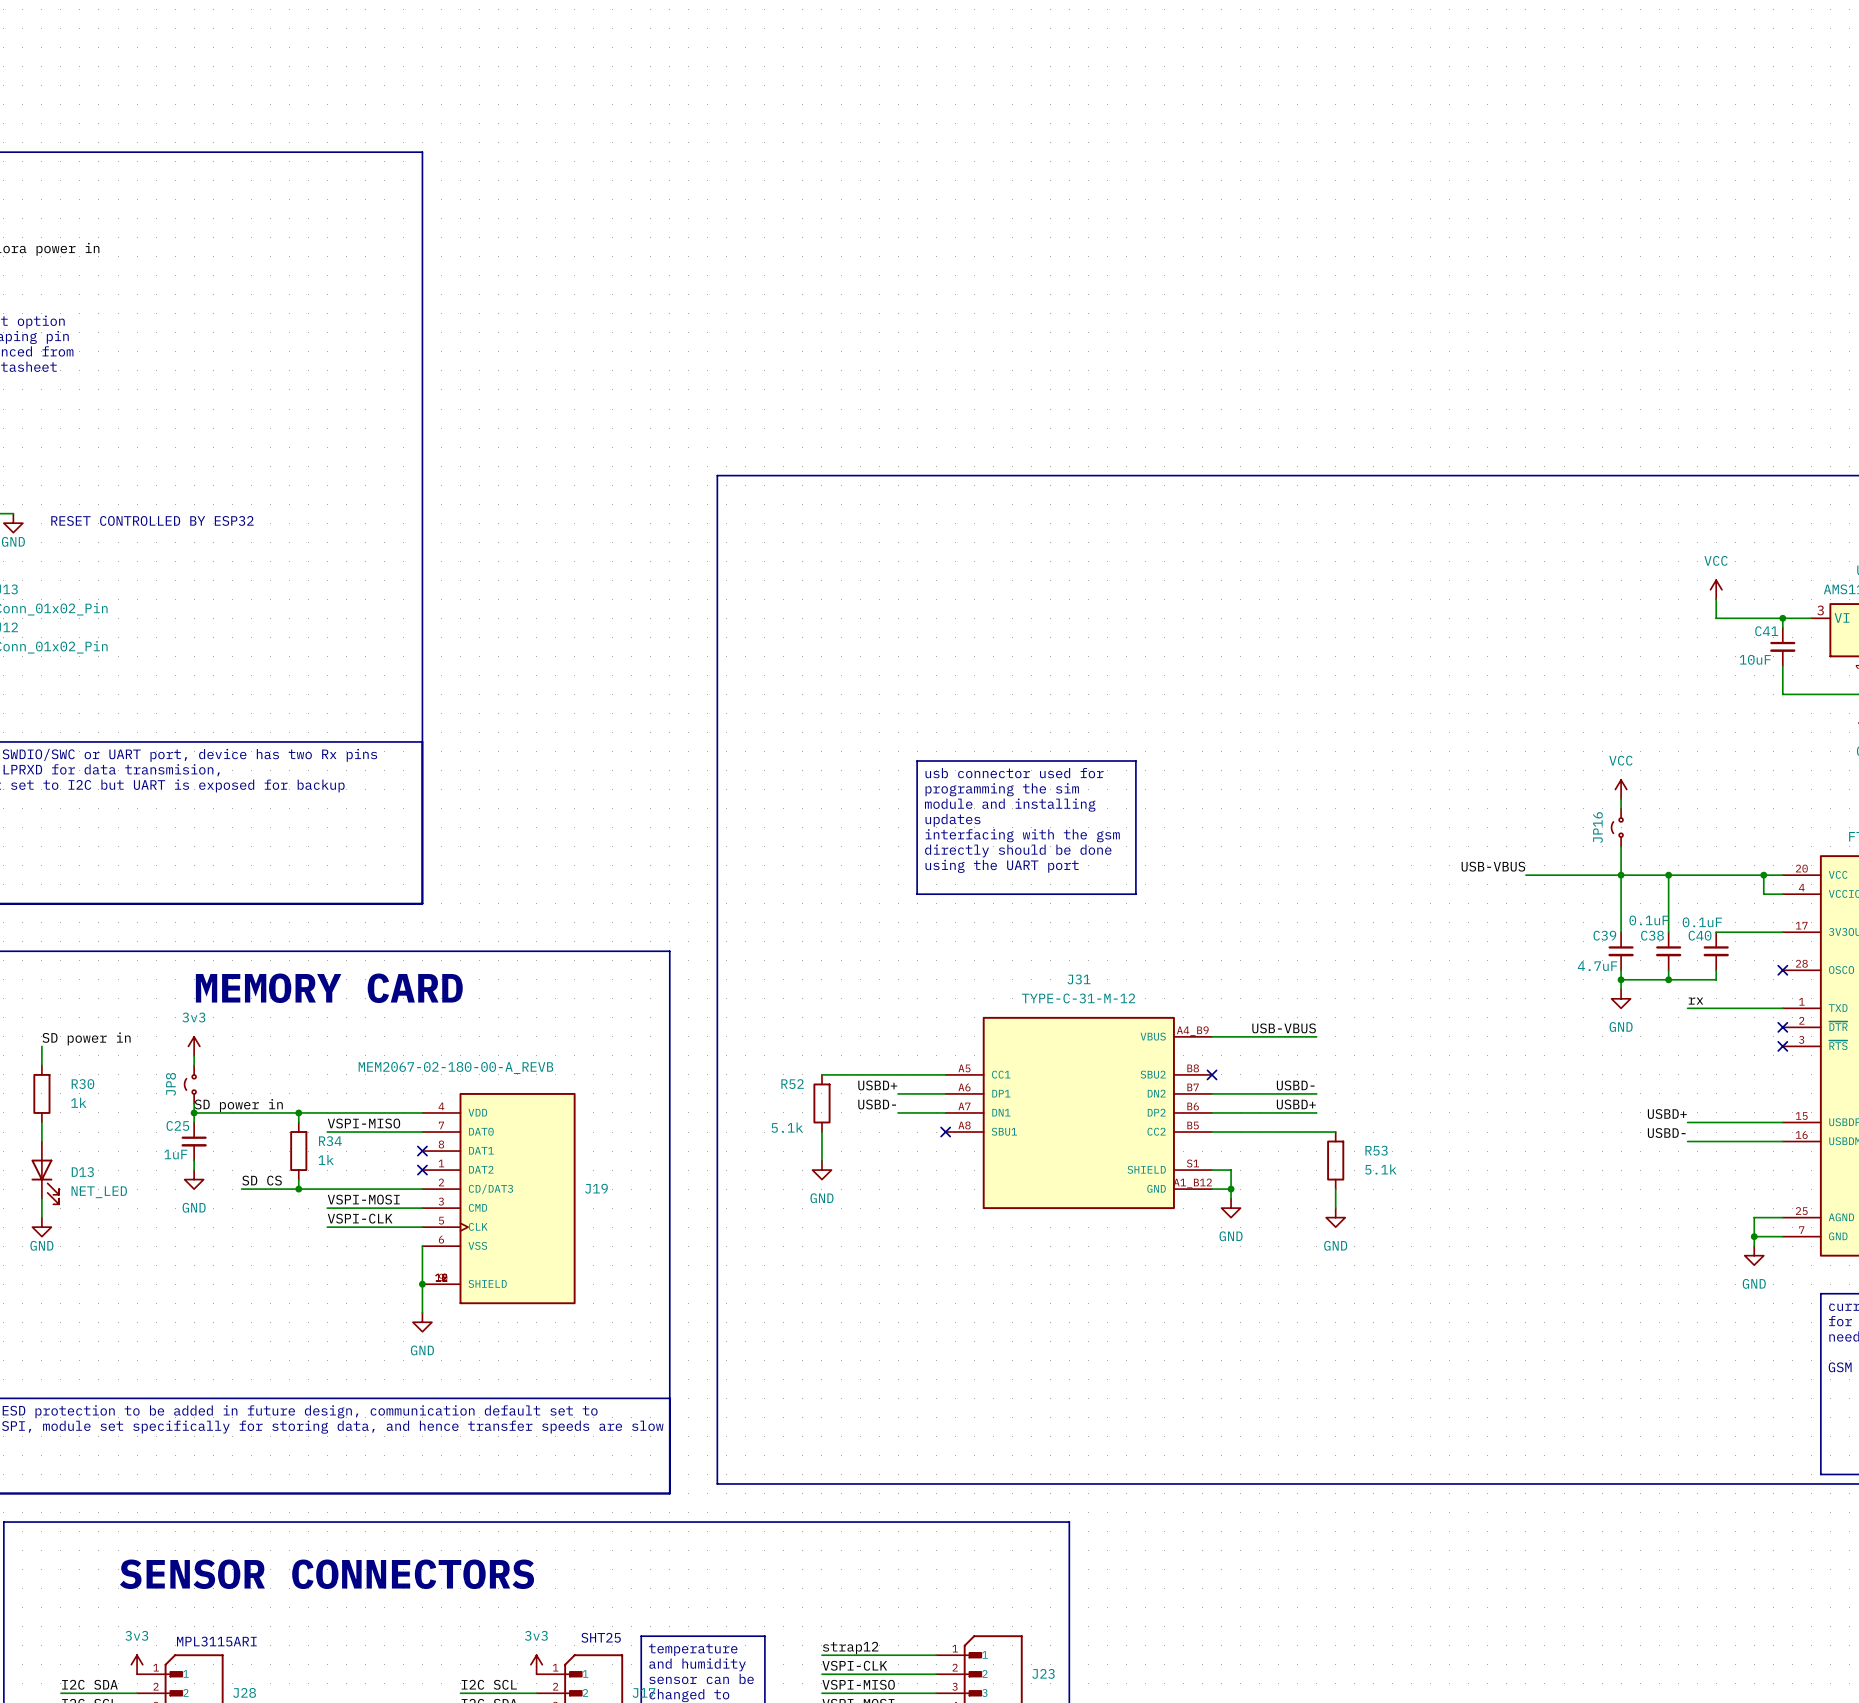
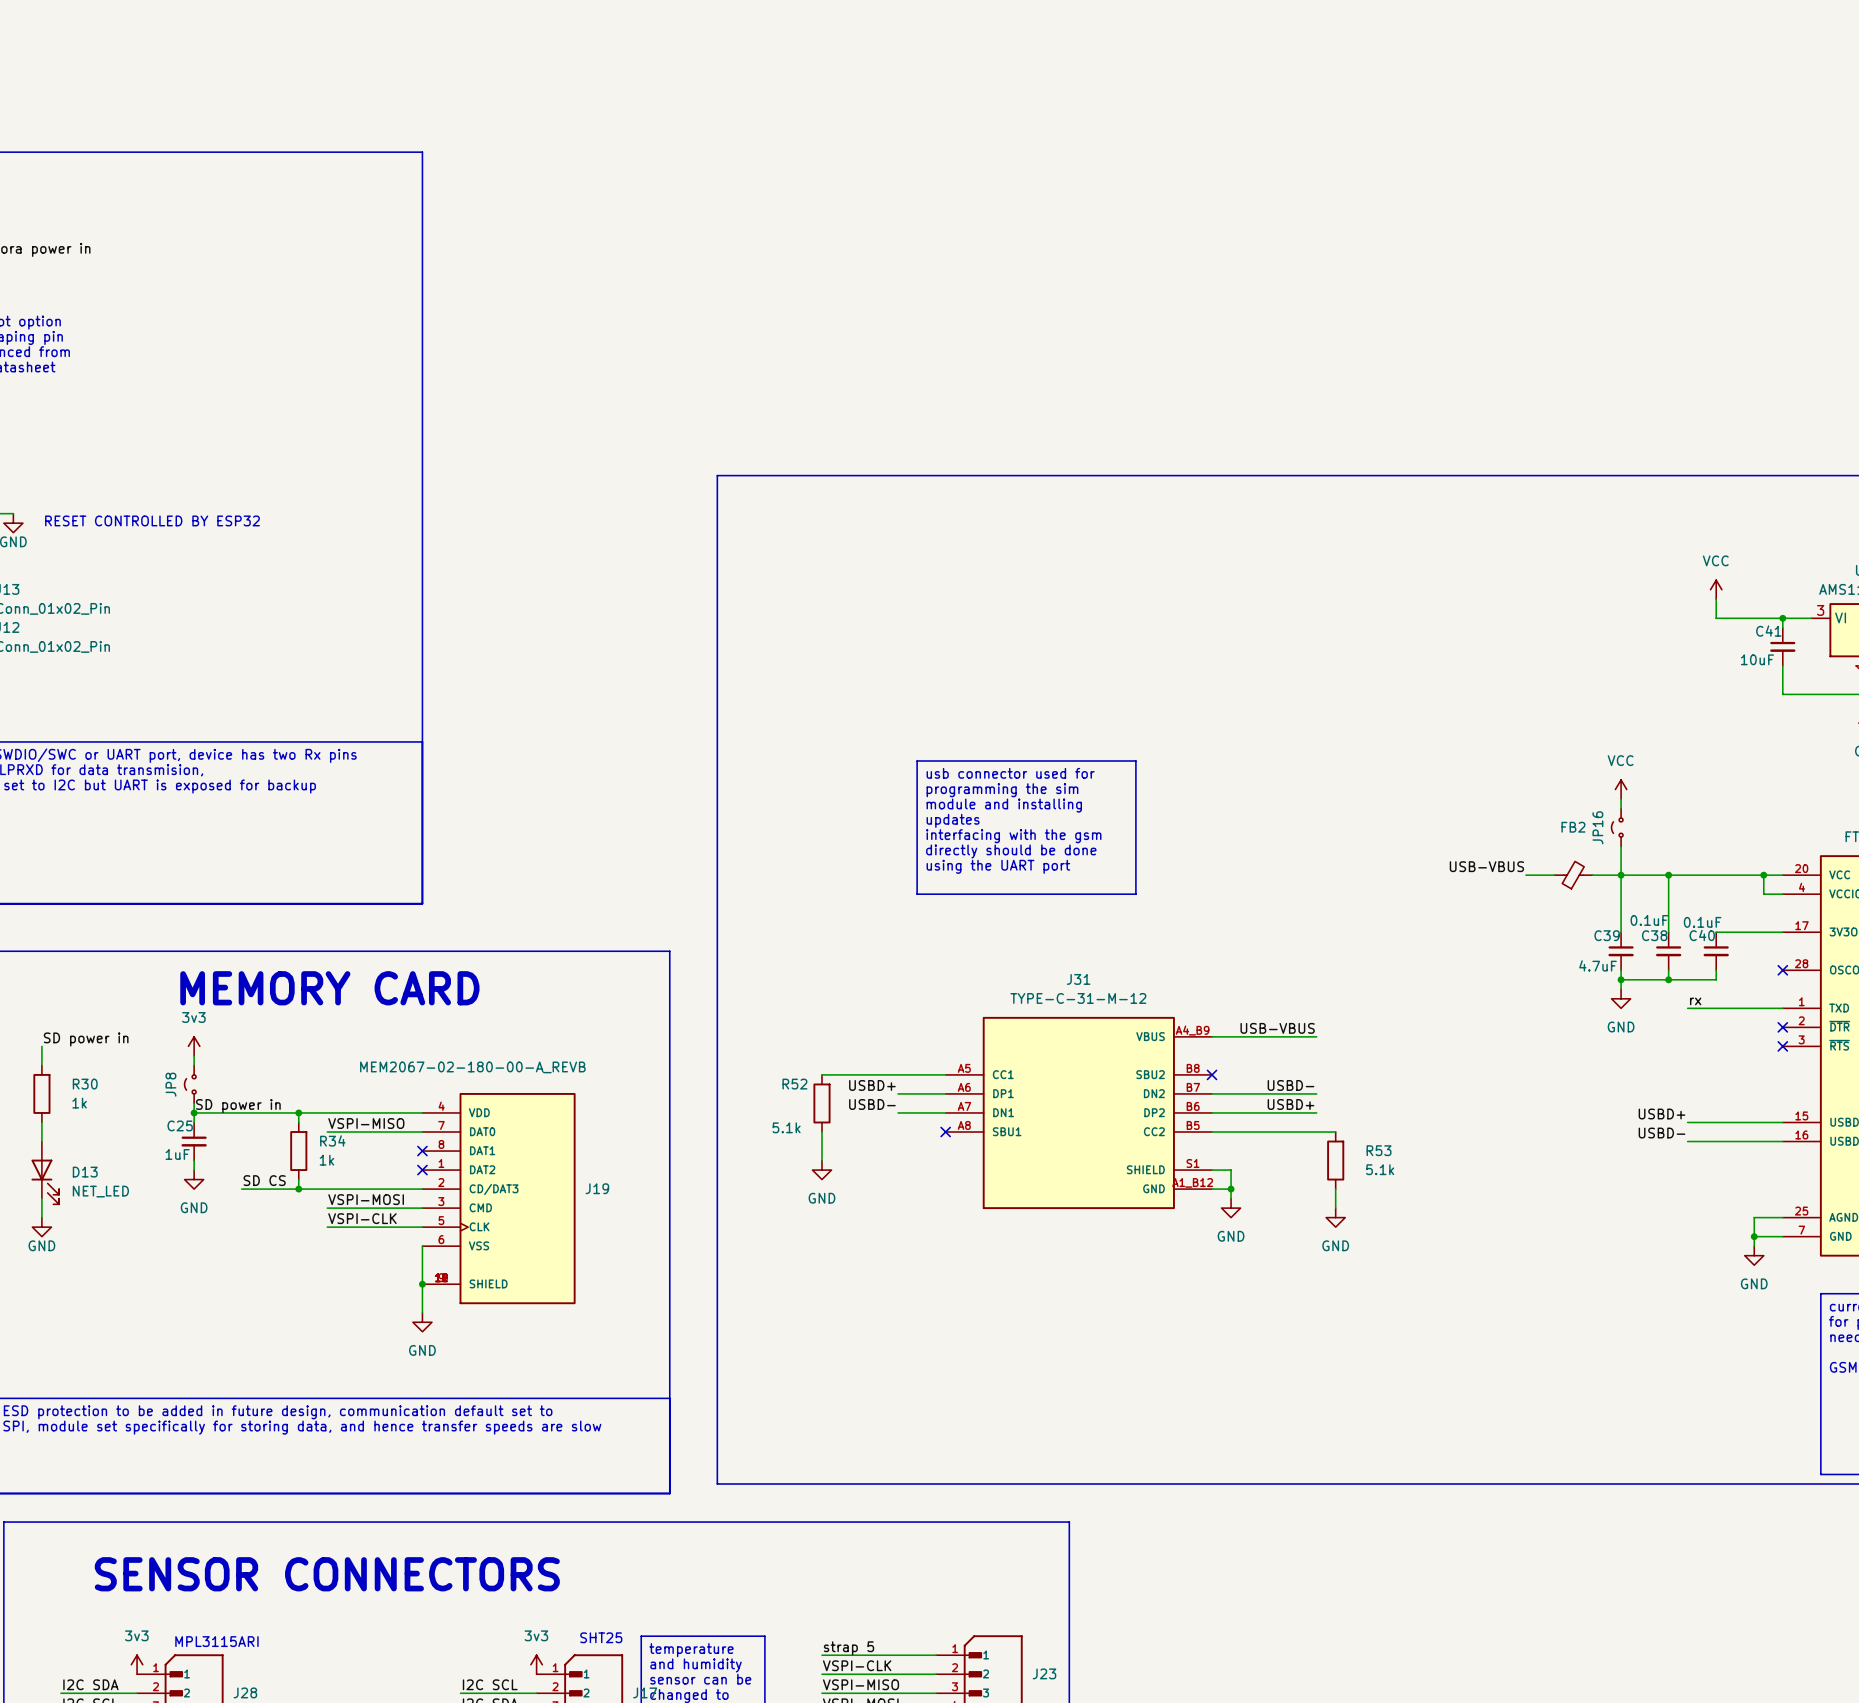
FB2: none -> (1573, 875)
label: strap12 (850, 1648) -> strap 5 (849, 1648)

